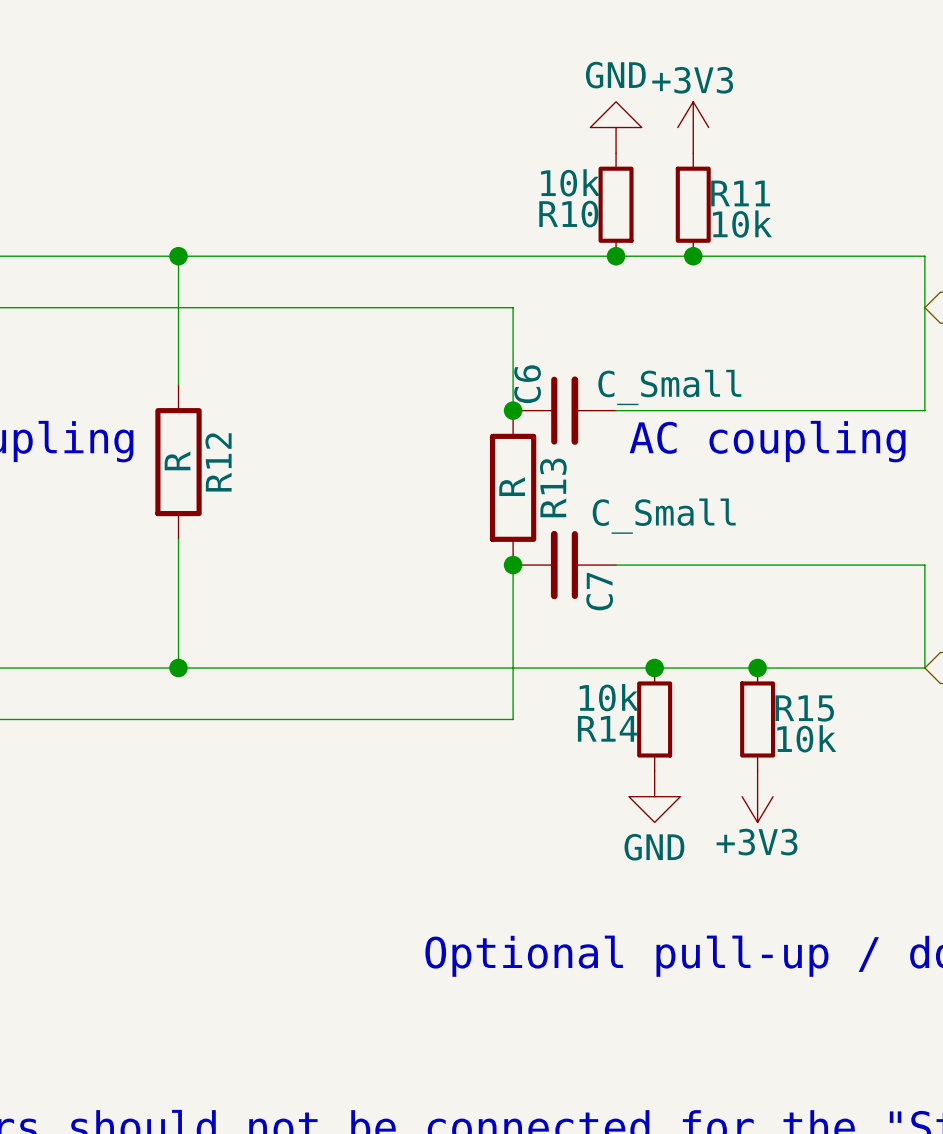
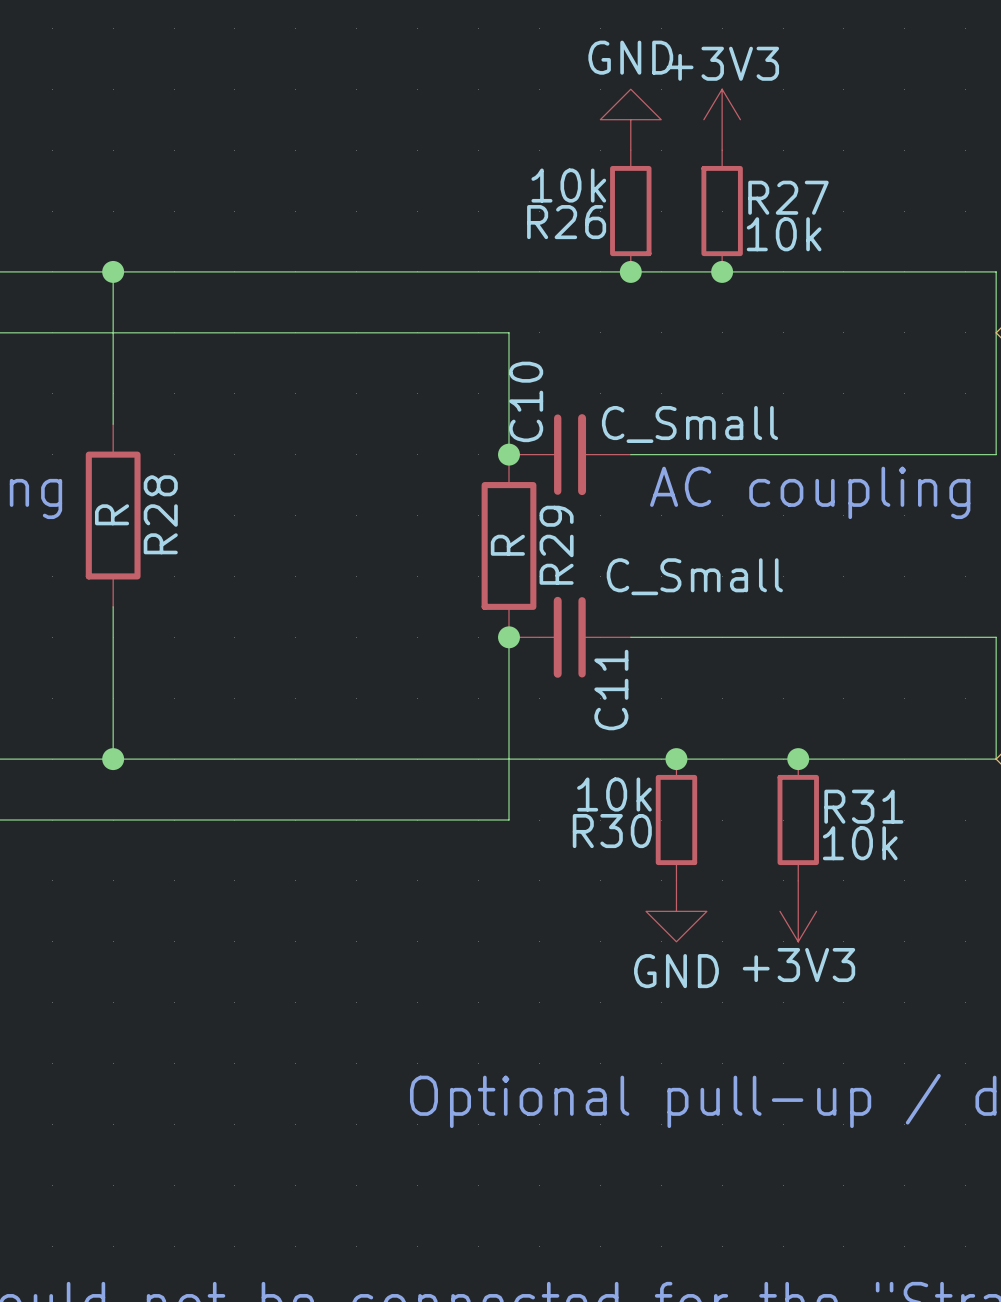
R11 name: R11 (740, 193) -> R27 (788, 197)
R10 name: R10 (568, 214) -> R26 (566, 222)
C6 name: C6 (527, 384) -> C10 (526, 401)
R12 name: R12 (218, 462) -> R28 (160, 514)
R13 name: R13 (553, 487) -> R29 (556, 545)
C7 name: C7 (599, 591) -> C11 (611, 690)
R15 name: R15 (804, 708) -> R31 (863, 806)
R14 name: R14 (607, 728) -> R30 (612, 831)

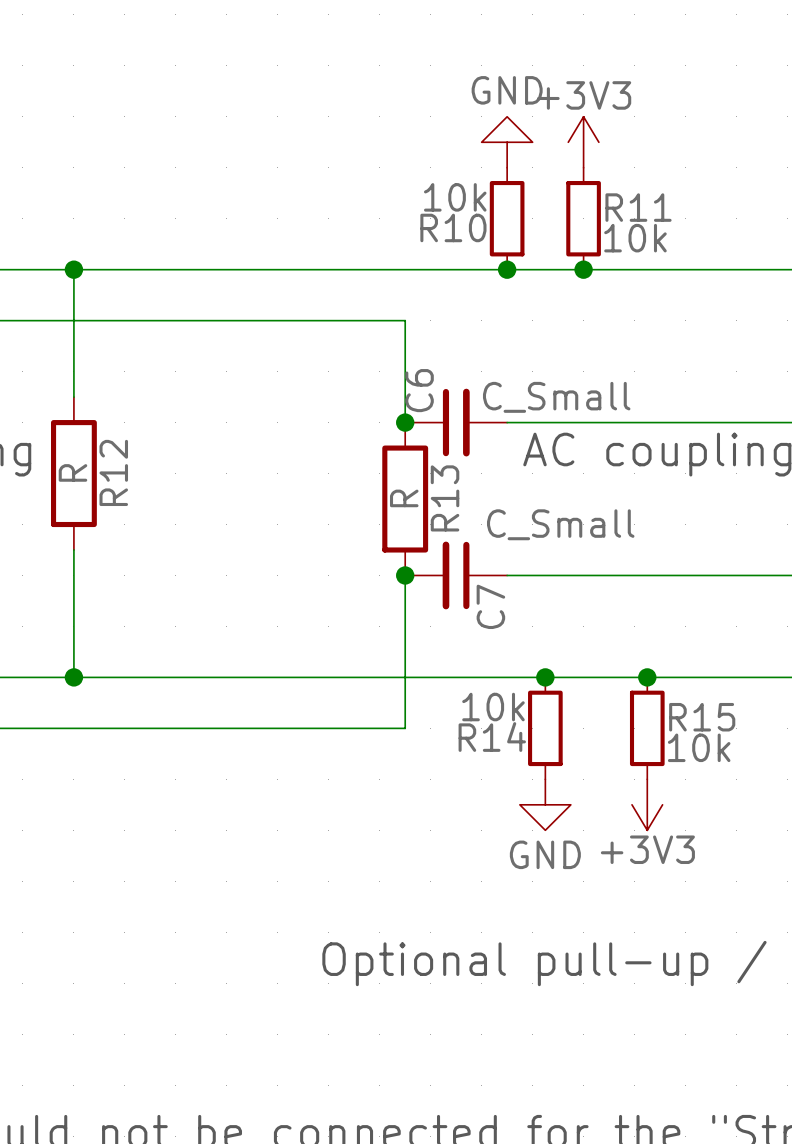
R27 name: R27 (788, 197) -> R11 (638, 207)
R26 name: R26 (566, 222) -> R10 (453, 227)
C10 name: C10 (526, 401) -> C6 (419, 390)
R28 name: R28 (160, 514) -> R12 (113, 472)
R29 name: R29 (556, 545) -> R13 (445, 498)
C11 name: C11 (611, 690) -> C7 (490, 606)
R31 name: R31 (863, 806) -> R15 (702, 717)
R30 name: R30 (612, 831) -> R14 (492, 737)

